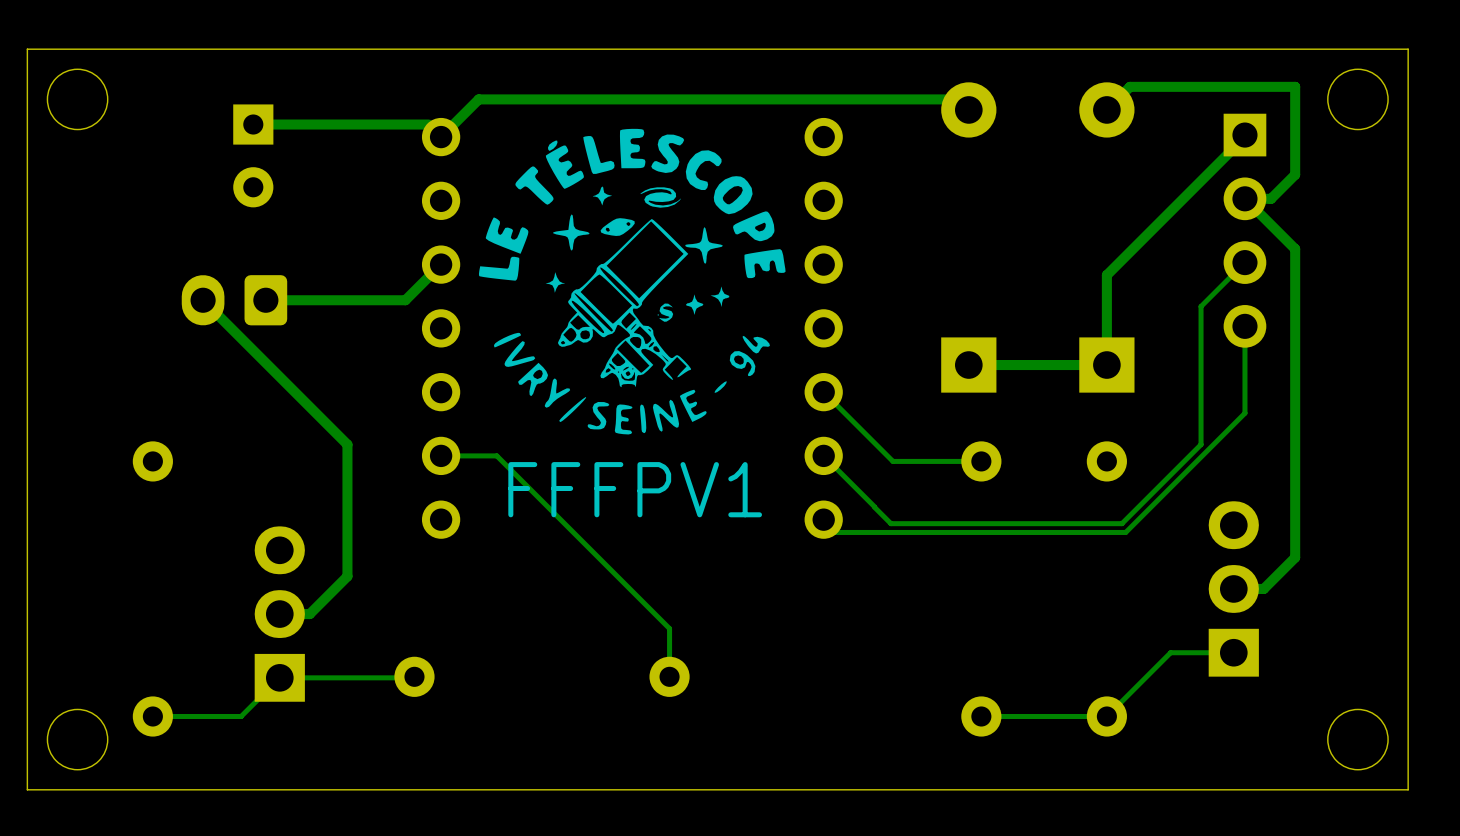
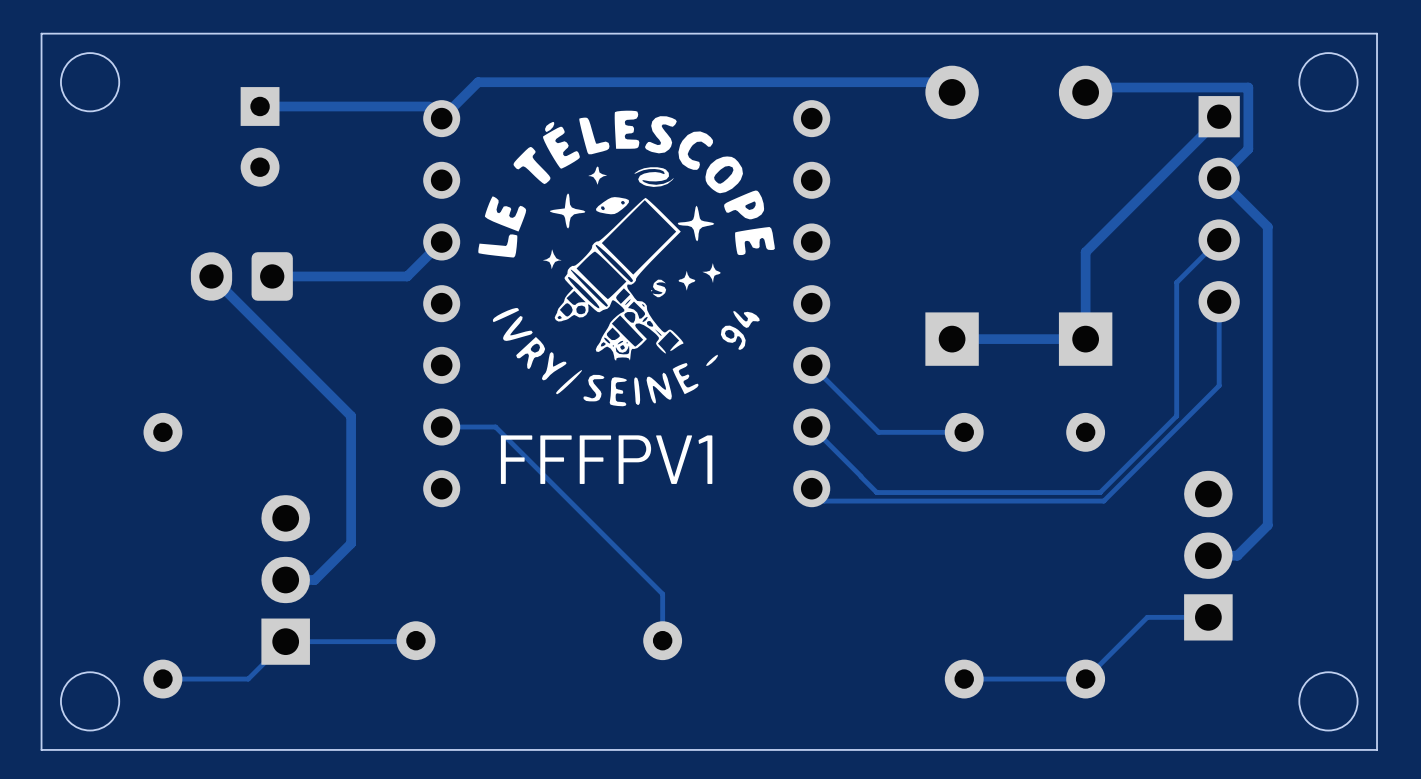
track: (1111, 104) (1129, 86) (1295, 86) (1295, 174) (1271, 198) (1244, 198) -> (1090, 87) (1248, 87) (1248, 149) (1219, 178)

